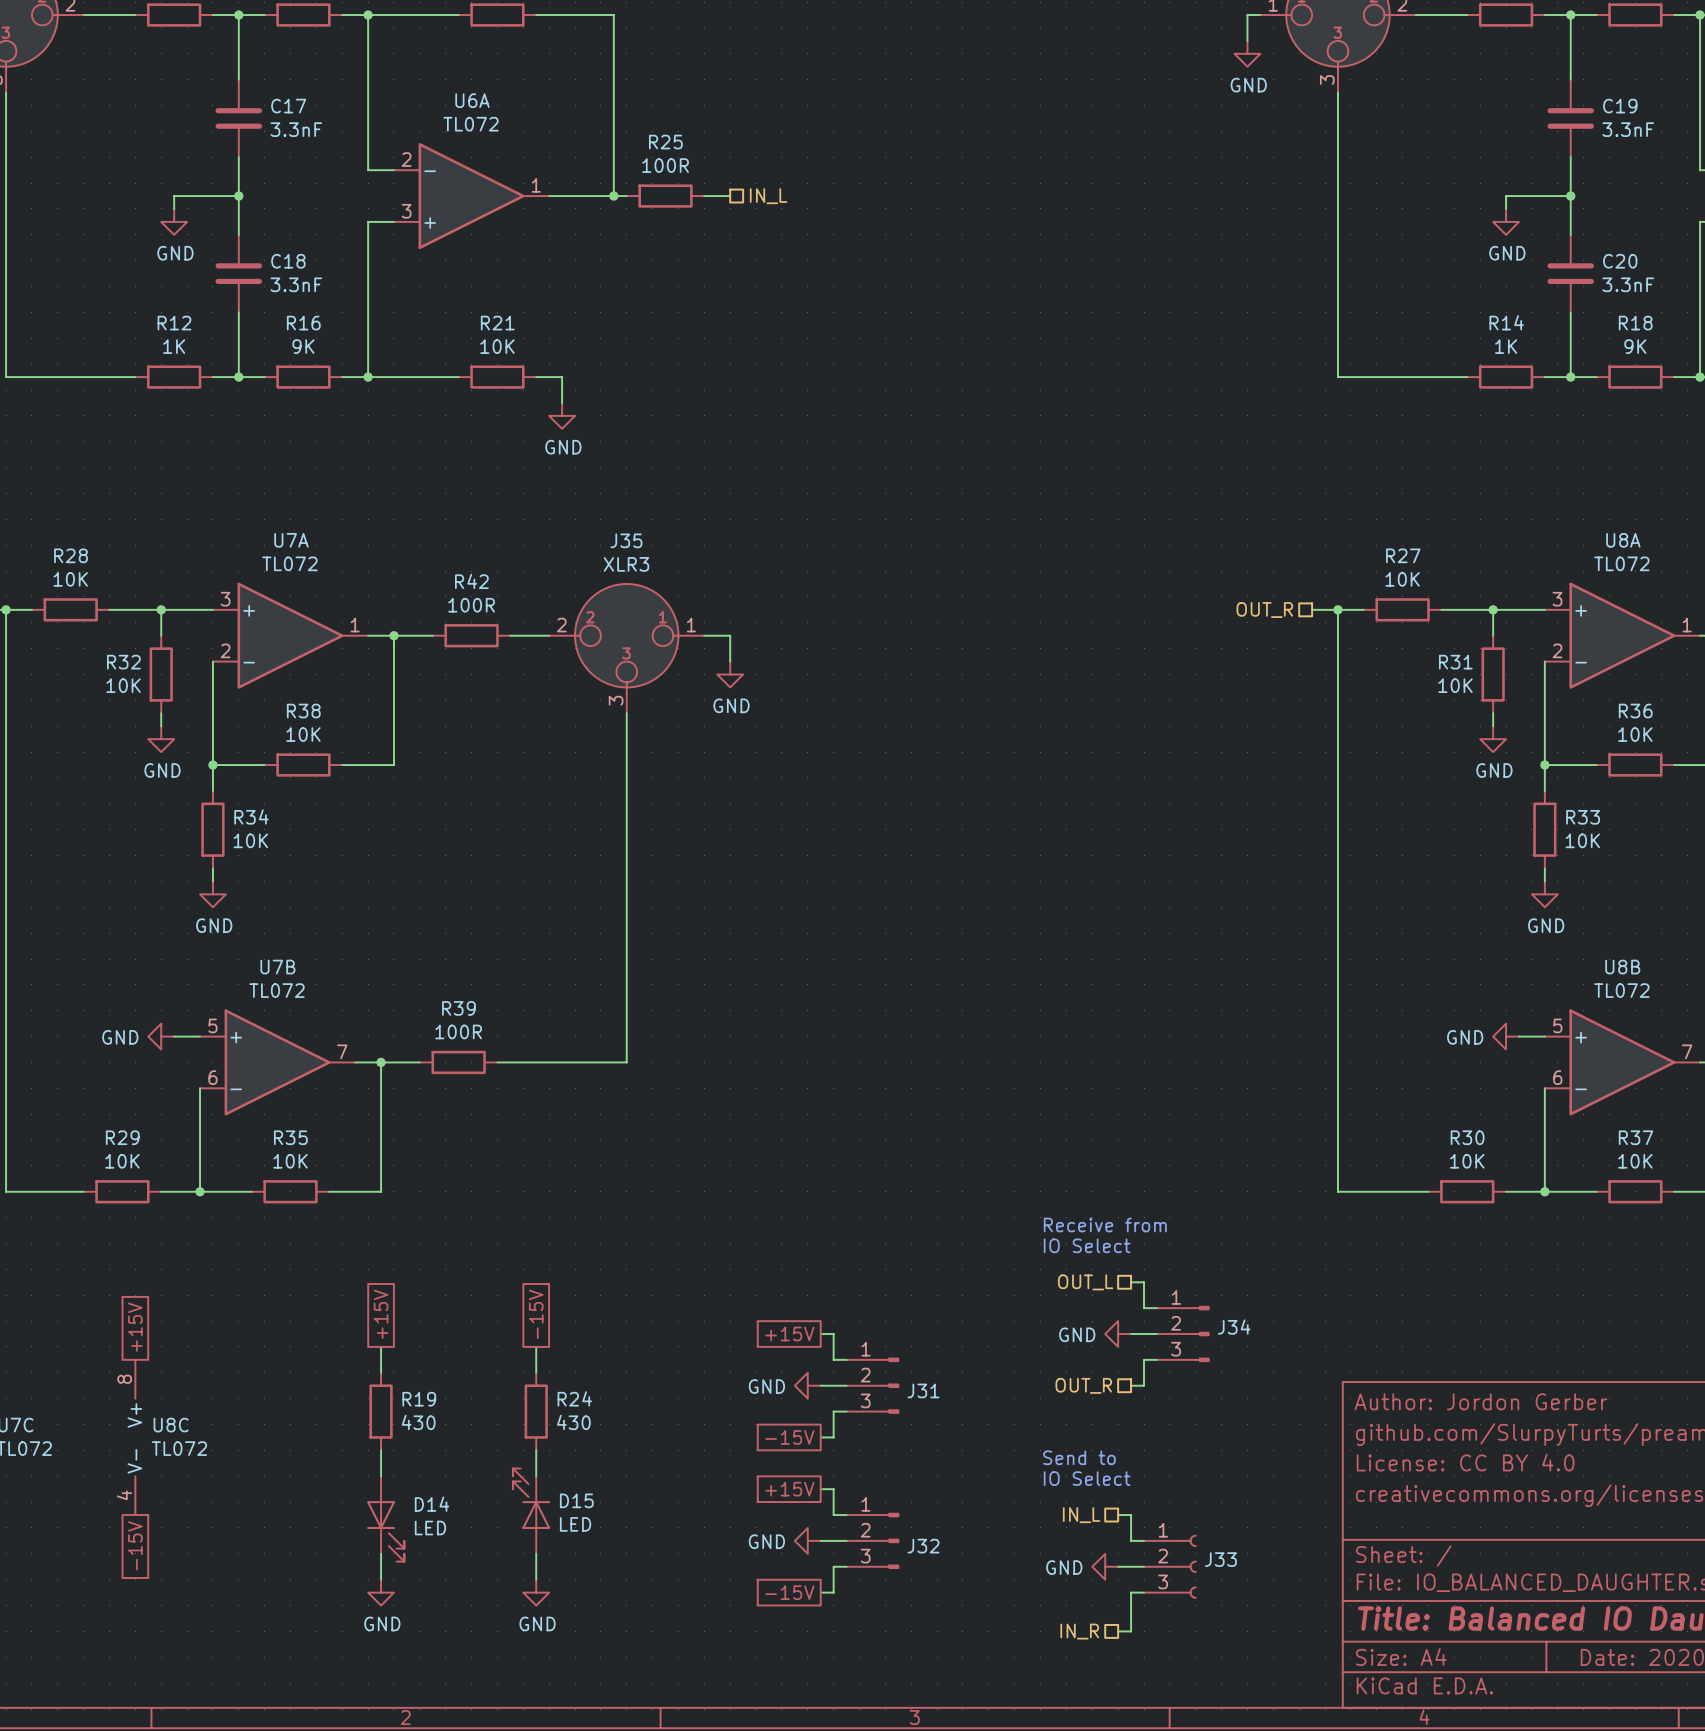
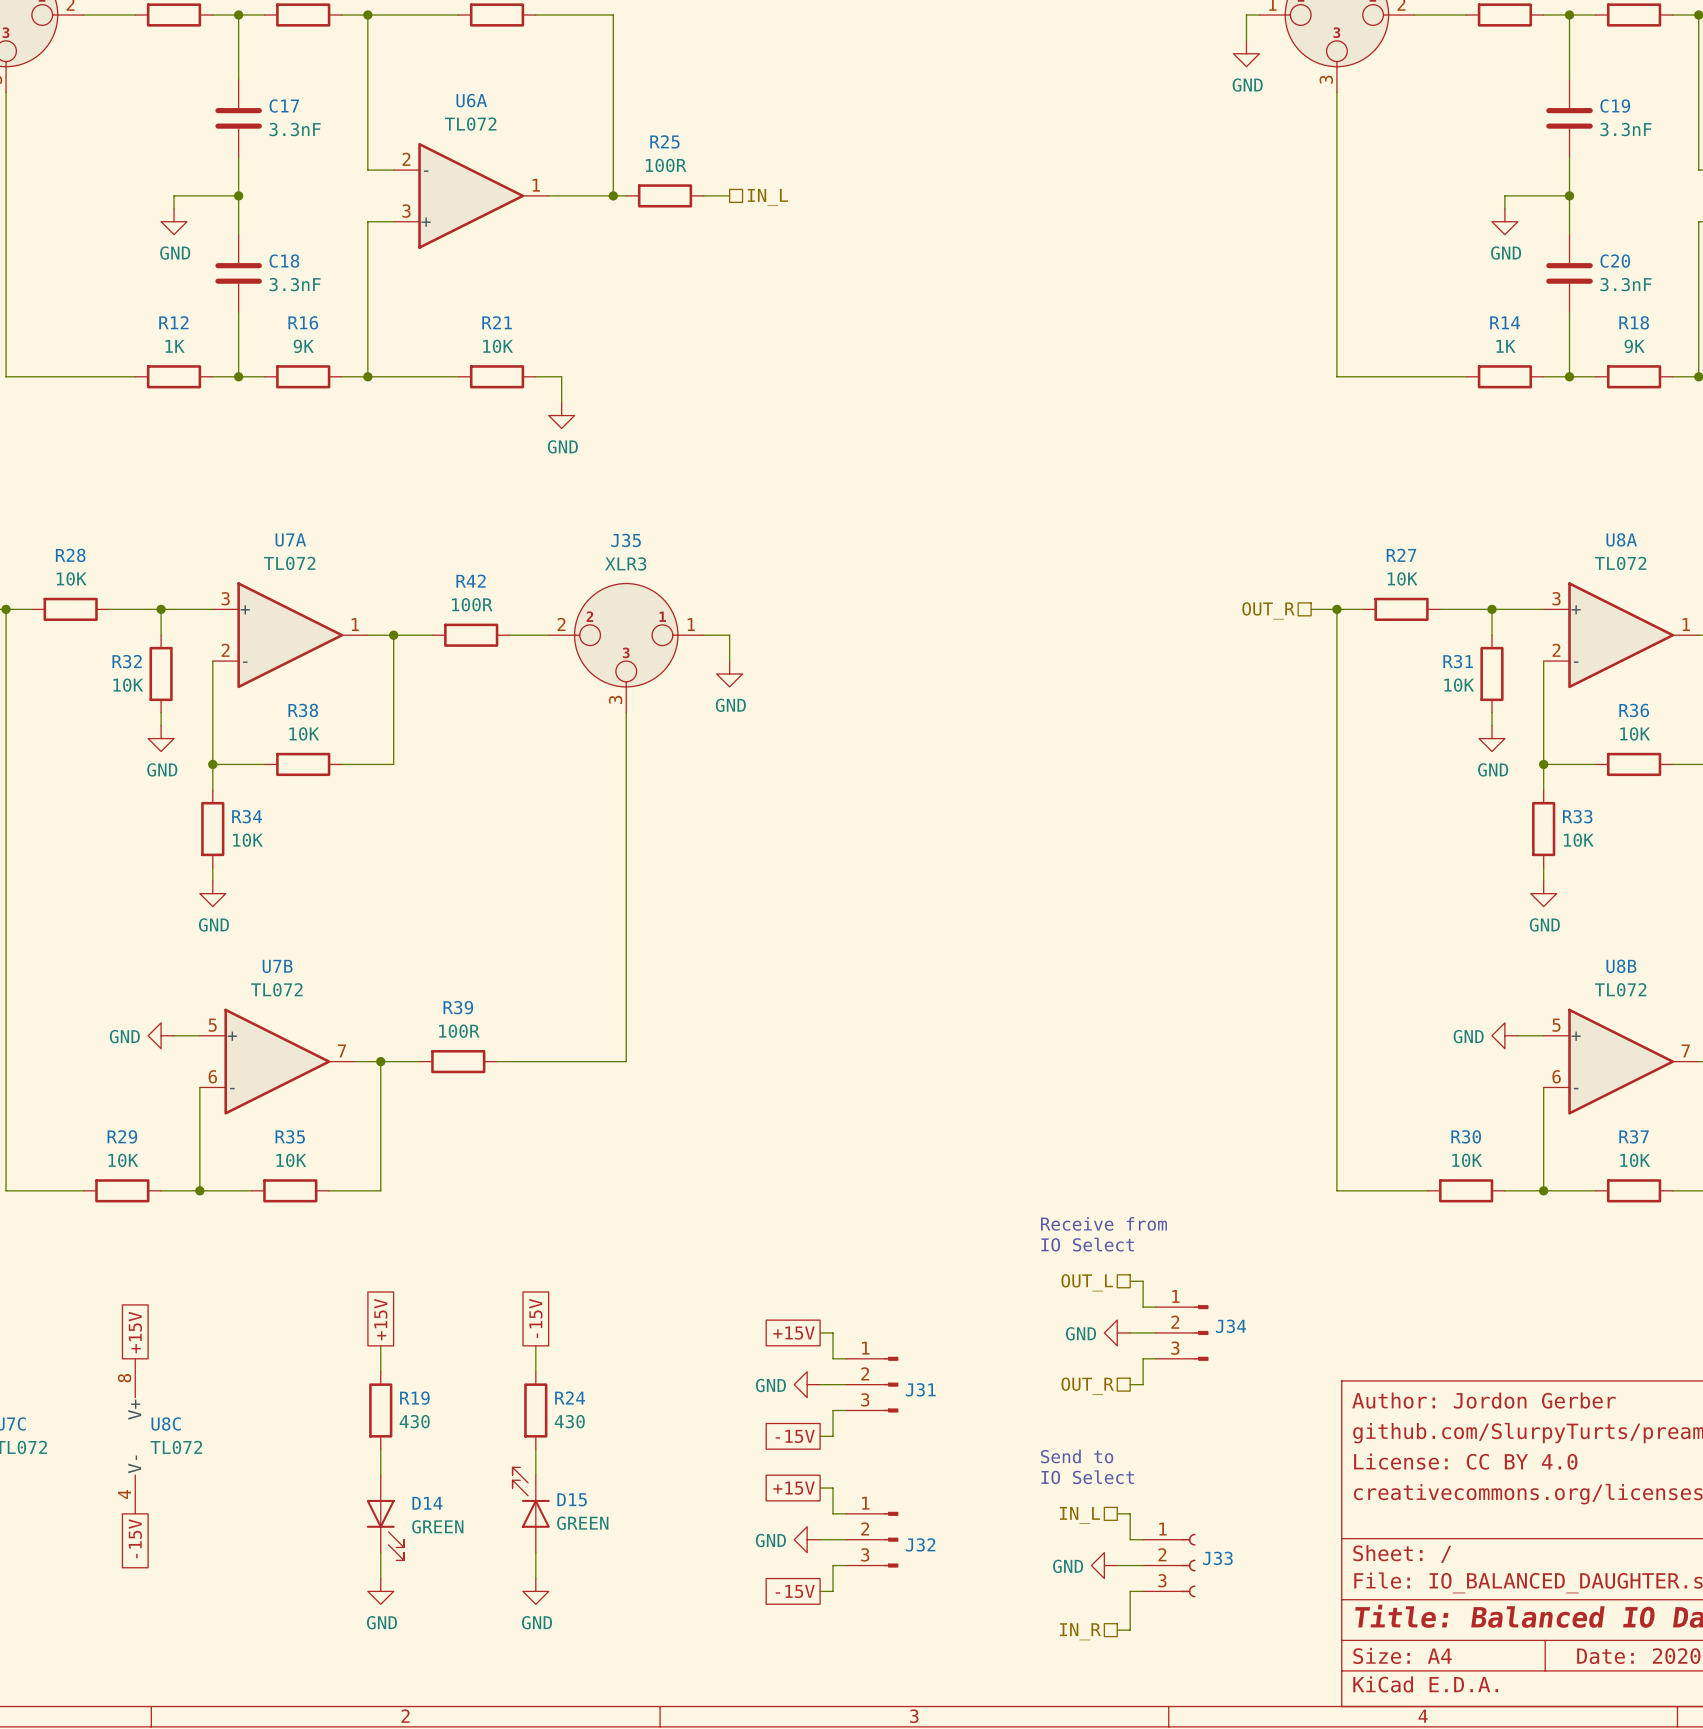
D15 value: LED (575, 1524) -> GREEN (582, 1523)
D14 value: LED (430, 1528) -> GREEN (437, 1526)

